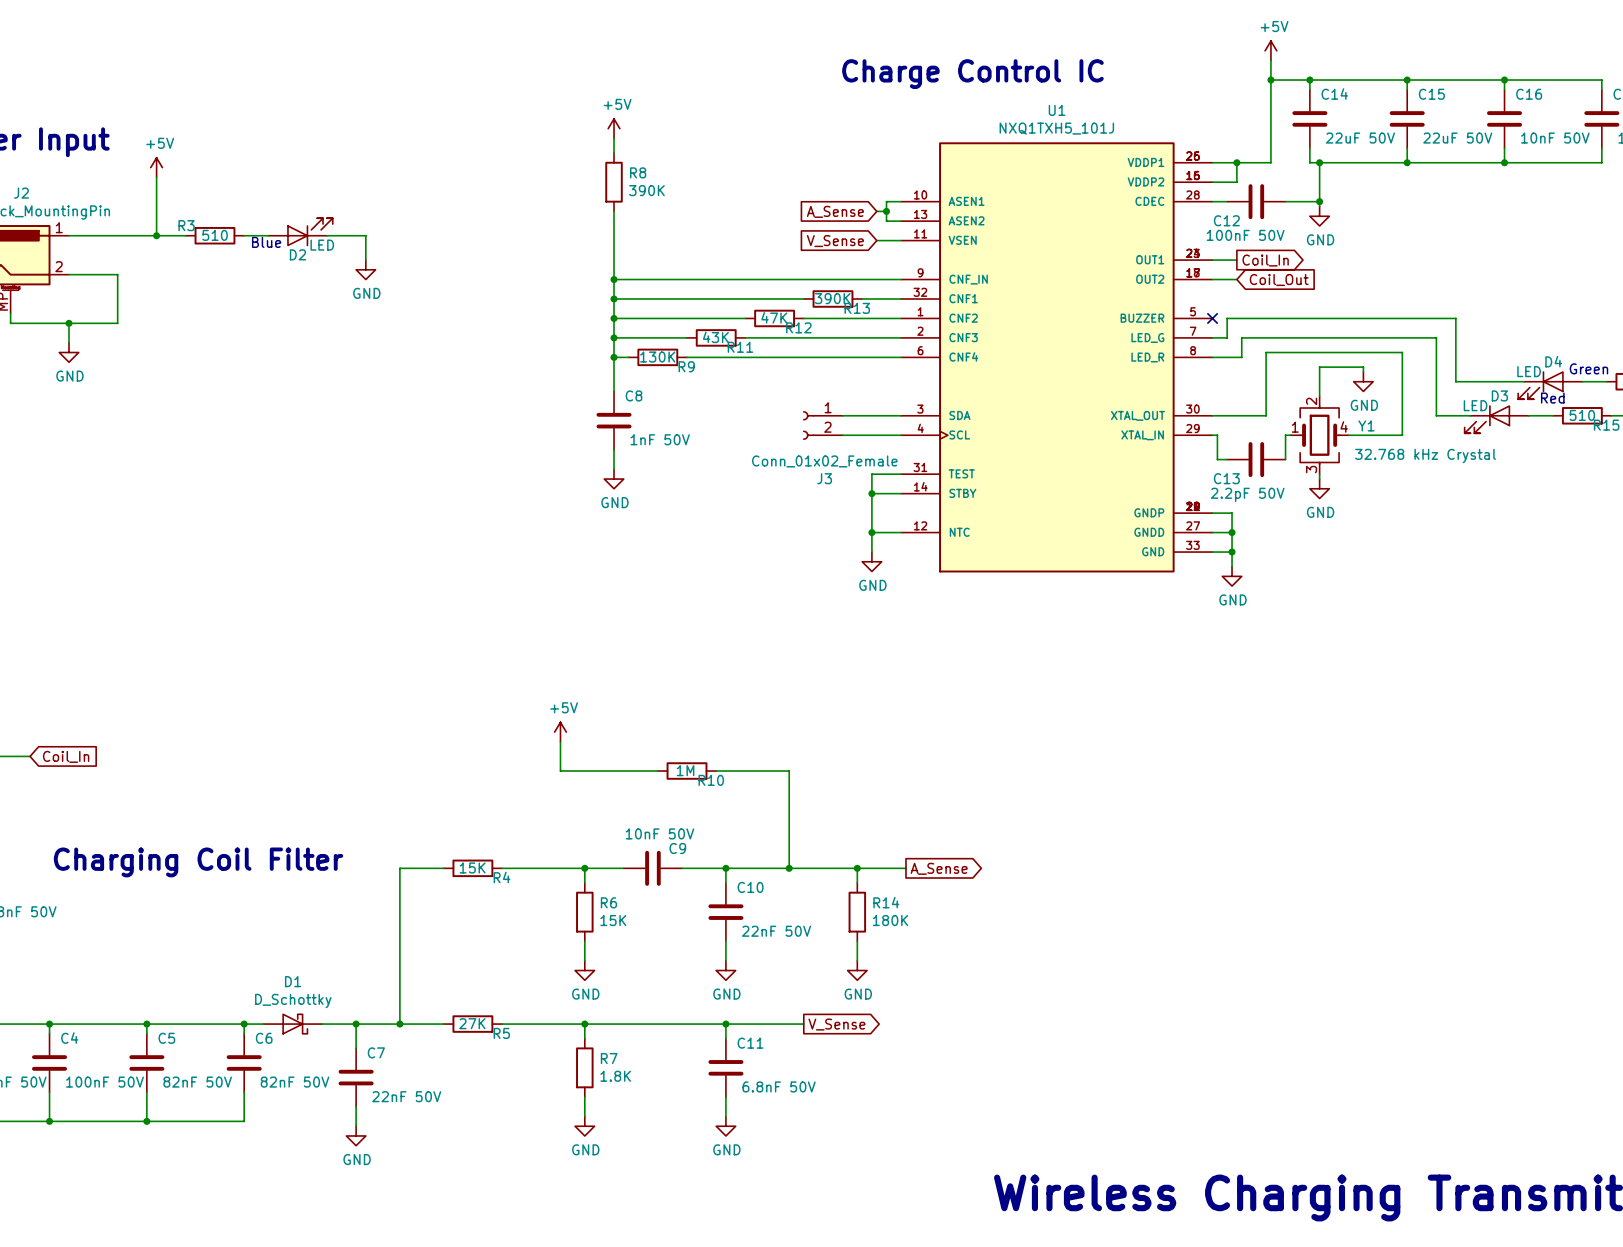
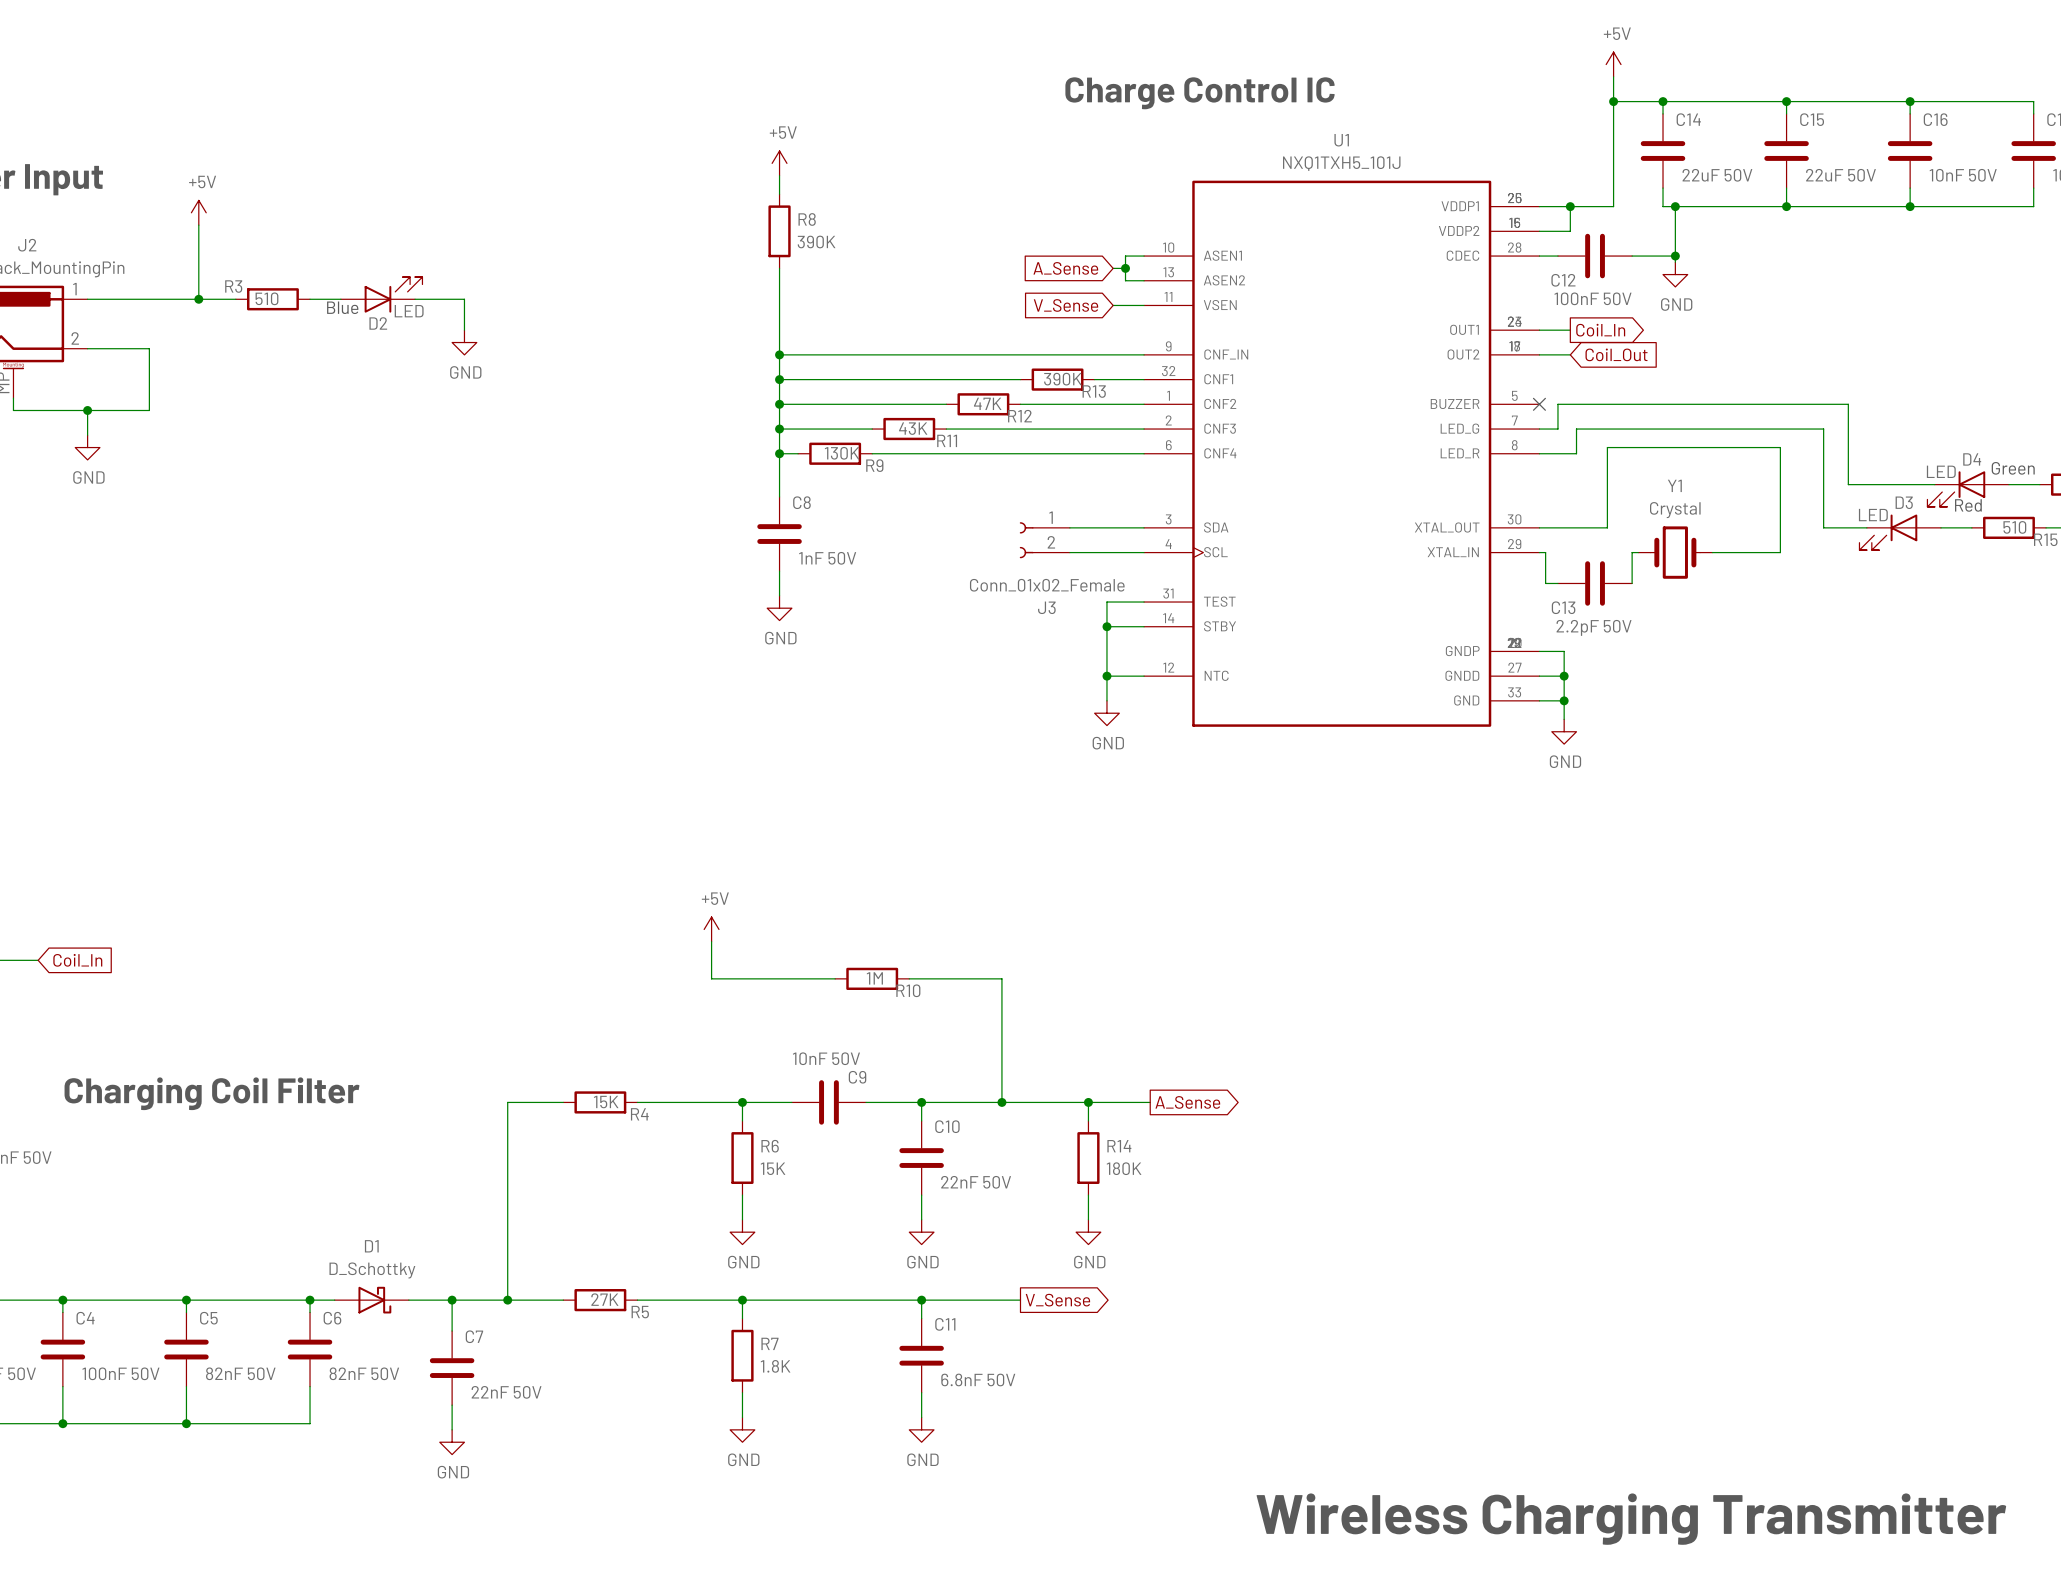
wire: (1363, 371) (1363, 367) (1319, 367) (1319, 396) -> none
power symbol: GND (1363, 381) -> none
Y1 symbol: [1290, 396, 1349, 475] -> [1638, 526, 1713, 579]
Y1 name position: Y1 (1366, 425) -> Y1 (1674, 485)
Y1 value: 32.768 kHz Crystal (1425, 455) -> Crystal (1675, 510)
wire: (1319, 474) (1319, 479) -> none
power symbol: GND (1319, 488) -> none

